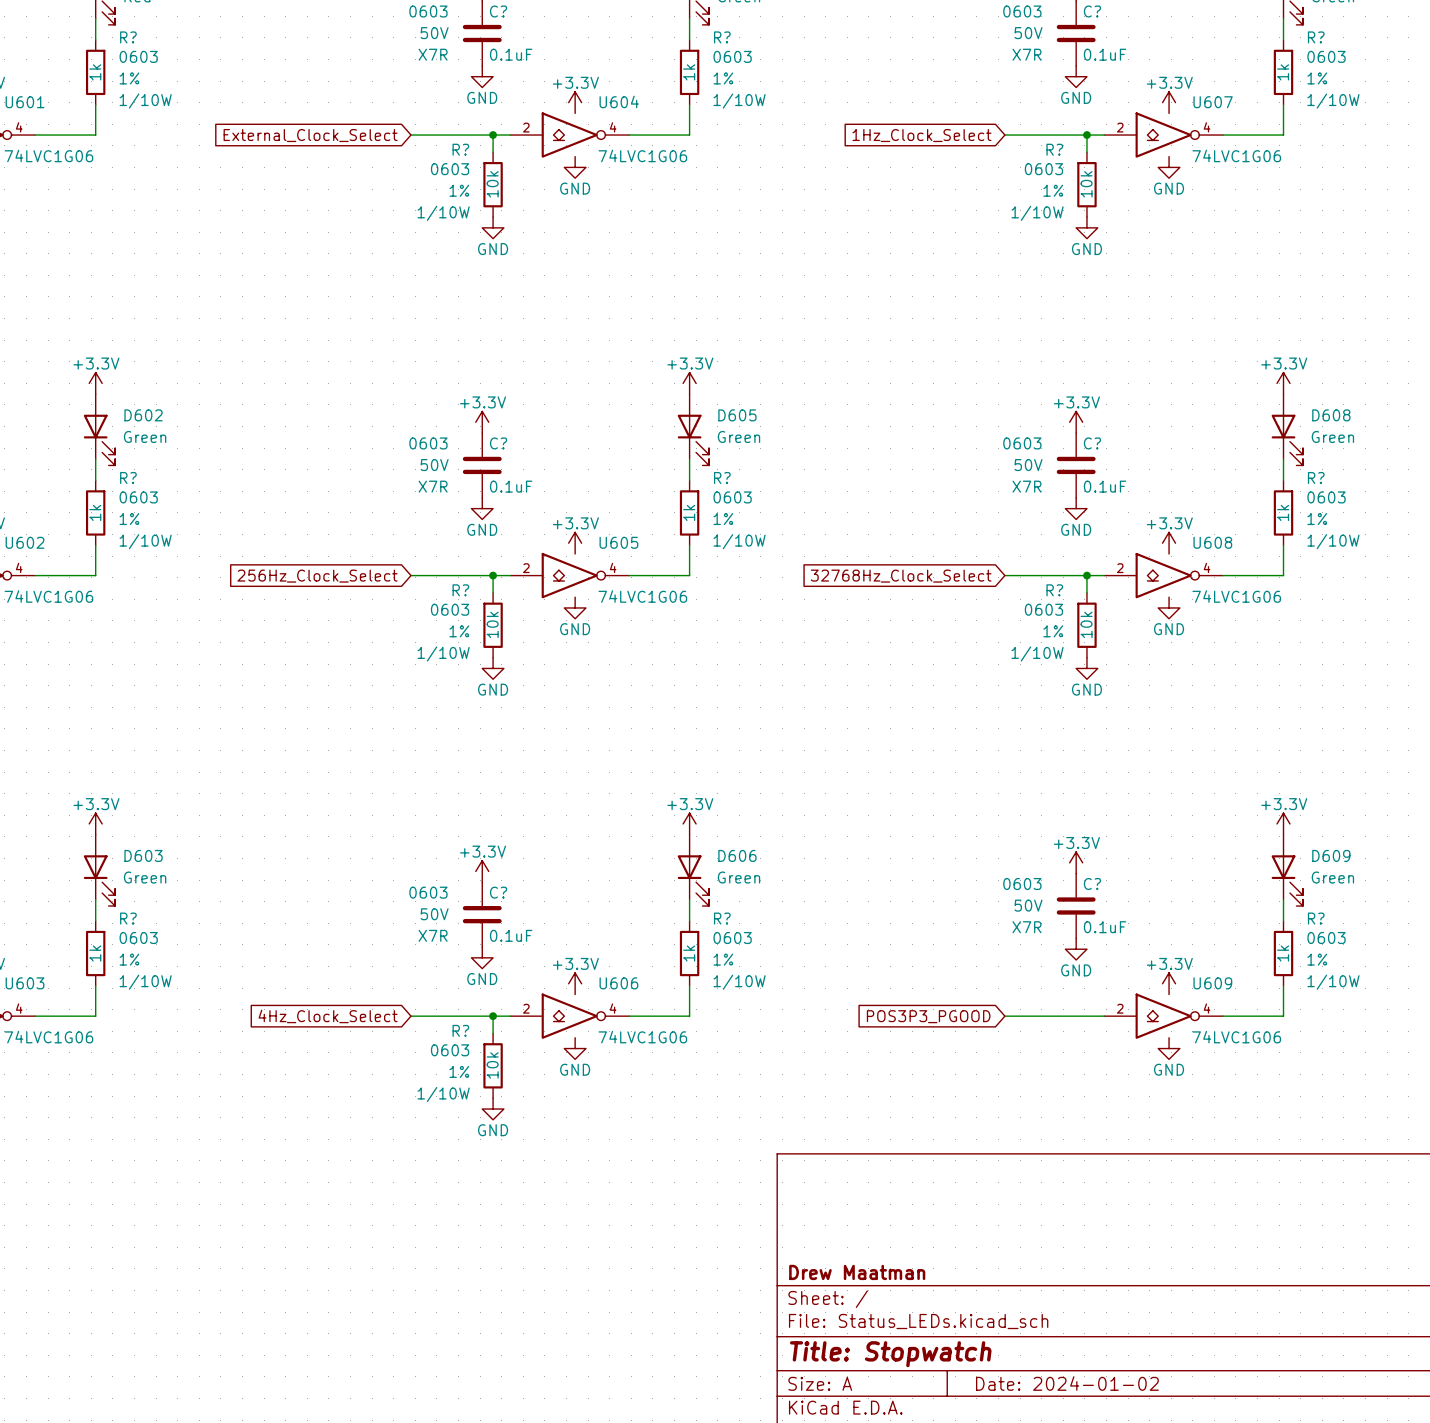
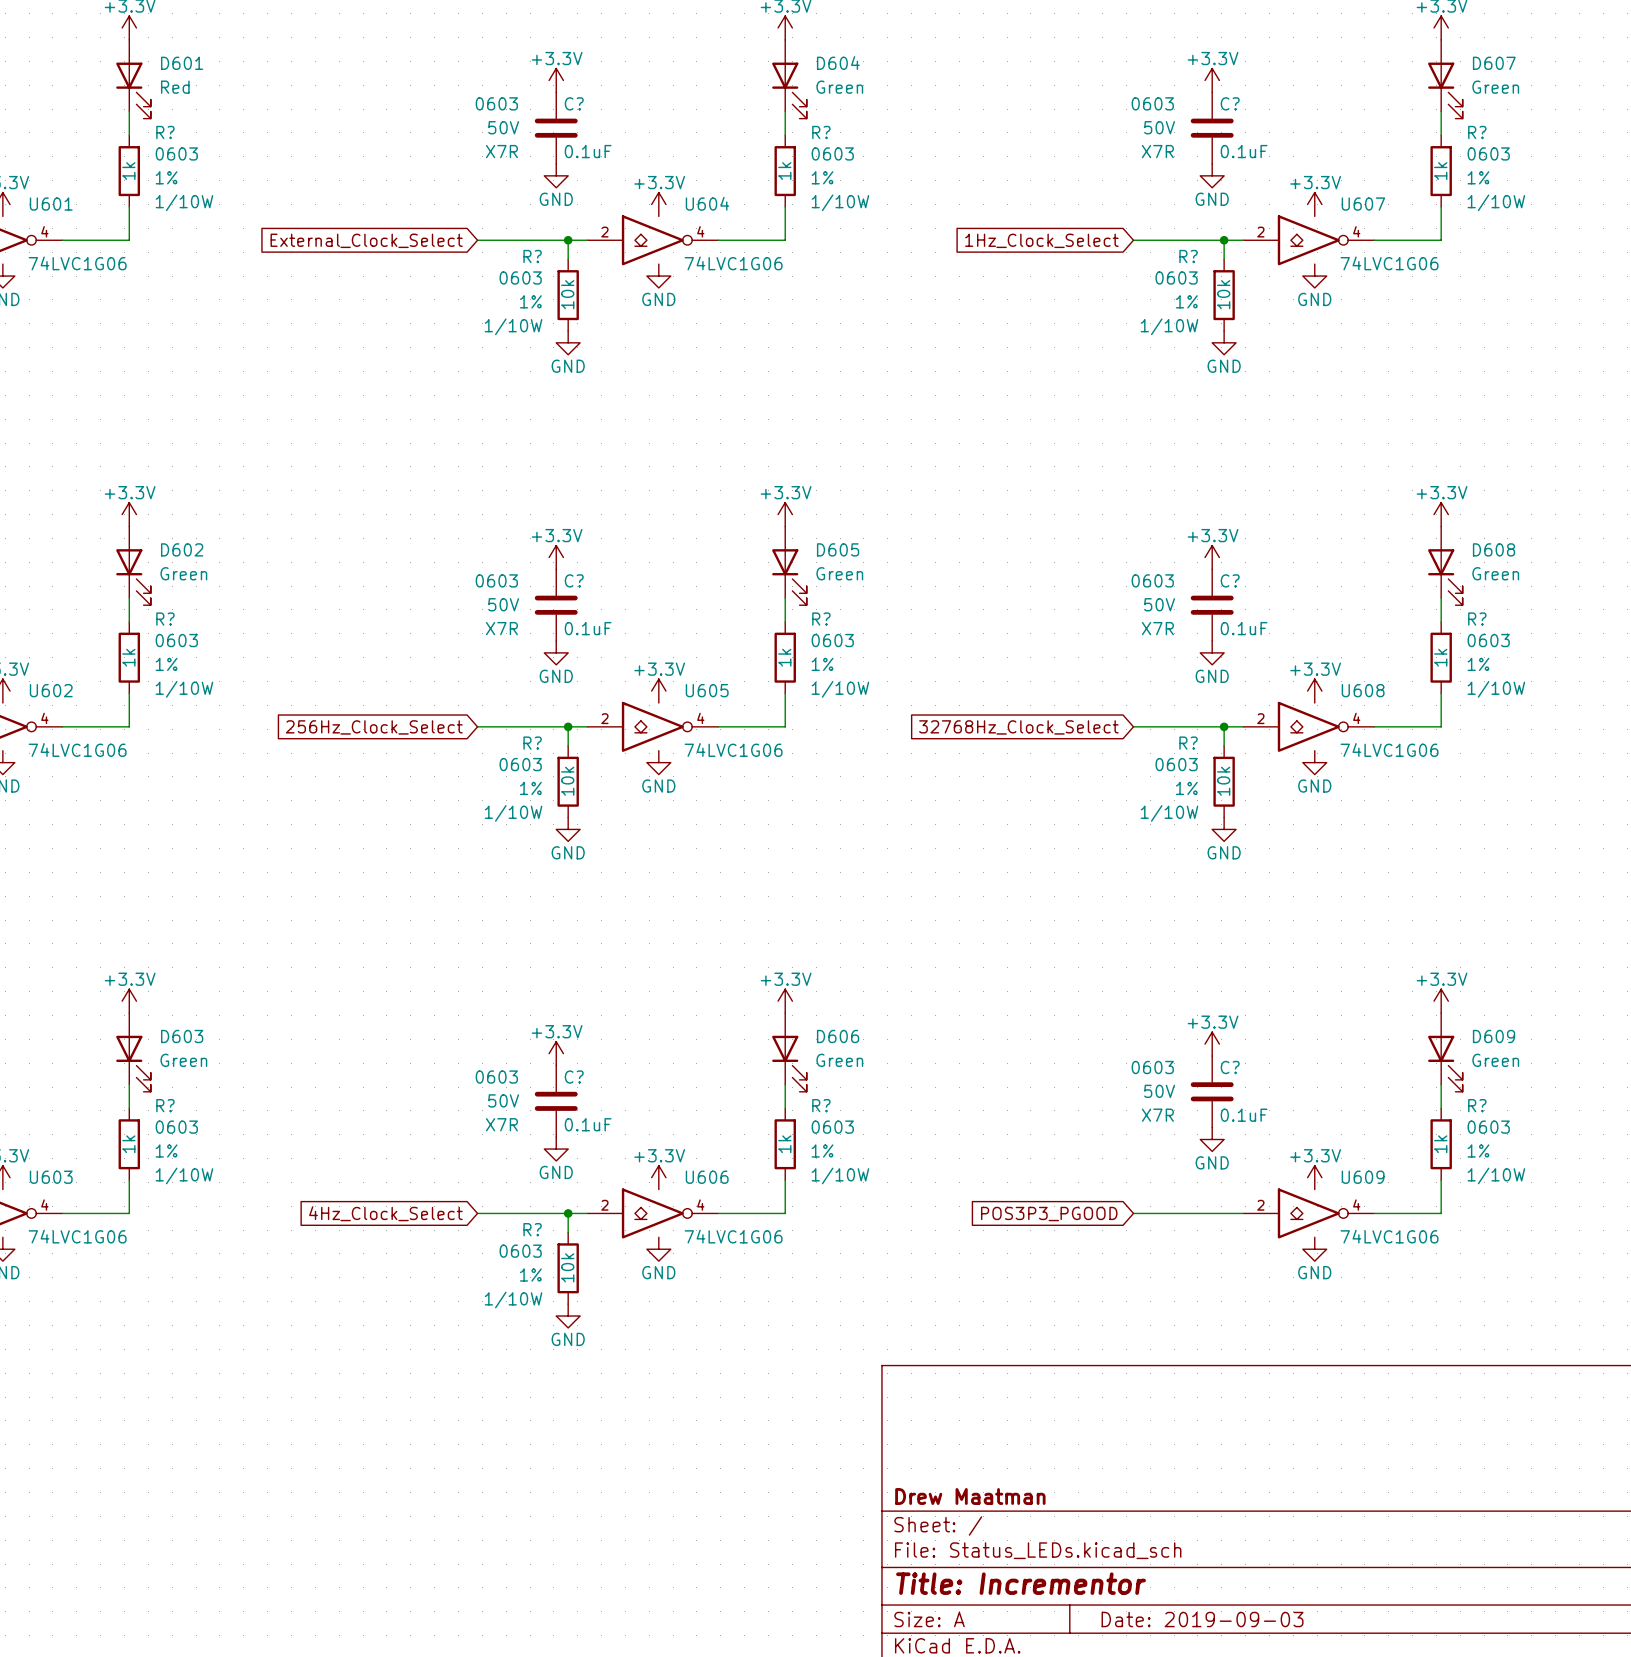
title block: Title: Stopwatch (890, 1354) -> Title: Incrementor (1021, 1583)
title block: Date: 2024-01-02 (1067, 1383) -> Date: 2019-09-03 (1202, 1619)

